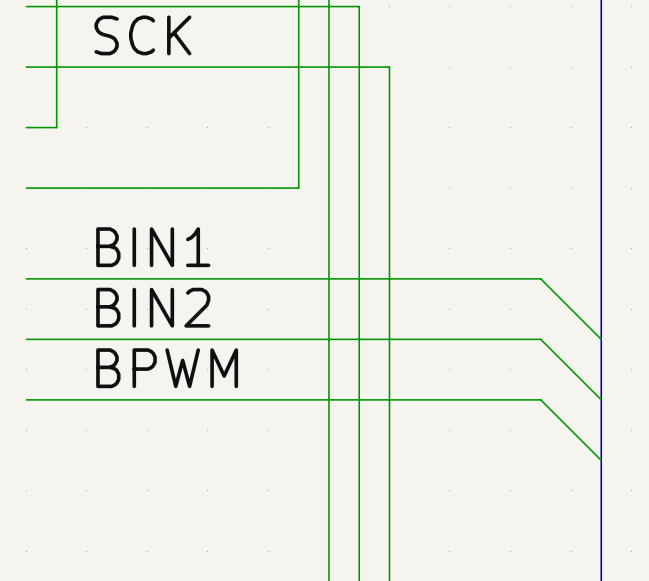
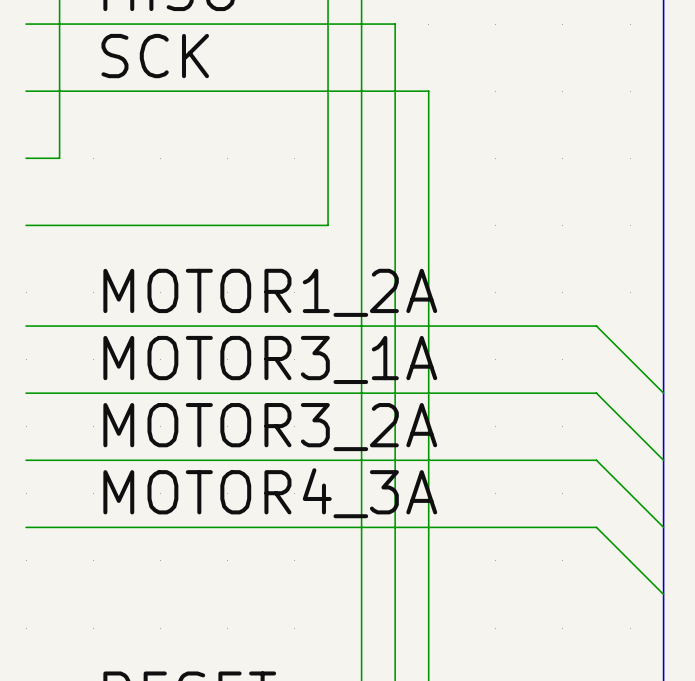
label: BIN1 (153, 247) -> MOTOR1_2A (270, 292)
label: BIN2 (153, 307) -> MOTOR3_1A (270, 359)
label: BPWM (167, 368) -> MOTOR3_2A (270, 427)
label: none -> MOTOR4_3A (270, 493)
wire: none -> (26, 527) (596, 527) (663, 594)

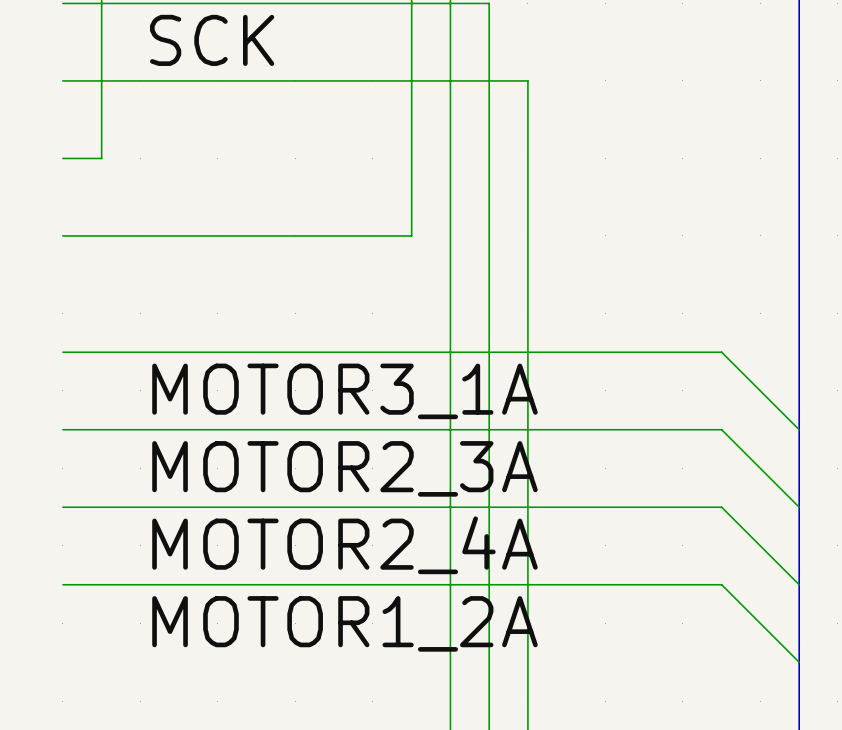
label position: MOTOR1_2A (270, 292) -> MOTOR1_2A (344, 623)
label: MOTOR3_2A (270, 427) -> MOTOR2_3A (344, 468)
label: MOTOR4_3A (270, 493) -> MOTOR2_4A (344, 545)

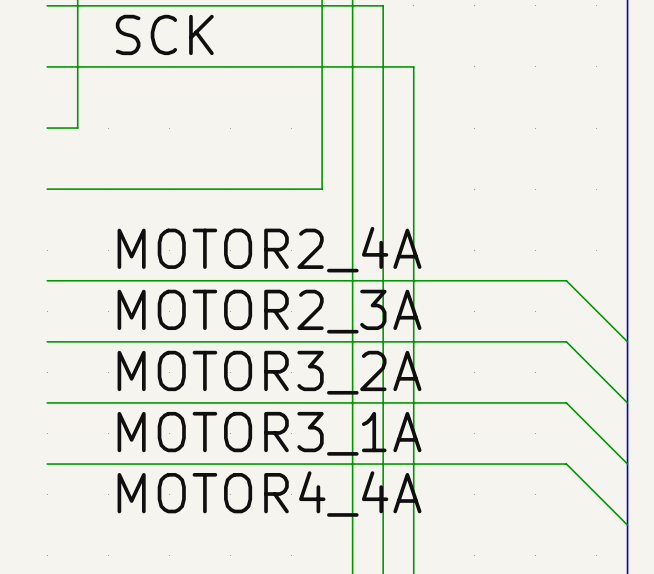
label: none -> MOTOR2_4A (269, 249)
label: MOTOR3_1A (344, 391) -> MOTOR2_3A (269, 311)
label: MOTOR2_3A (344, 468) -> MOTOR3_2A (269, 372)
label: MOTOR2_4A (344, 545) -> MOTOR3_1A (269, 433)
label: MOTOR1_2A (344, 623) -> MOTOR4_4A (269, 494)

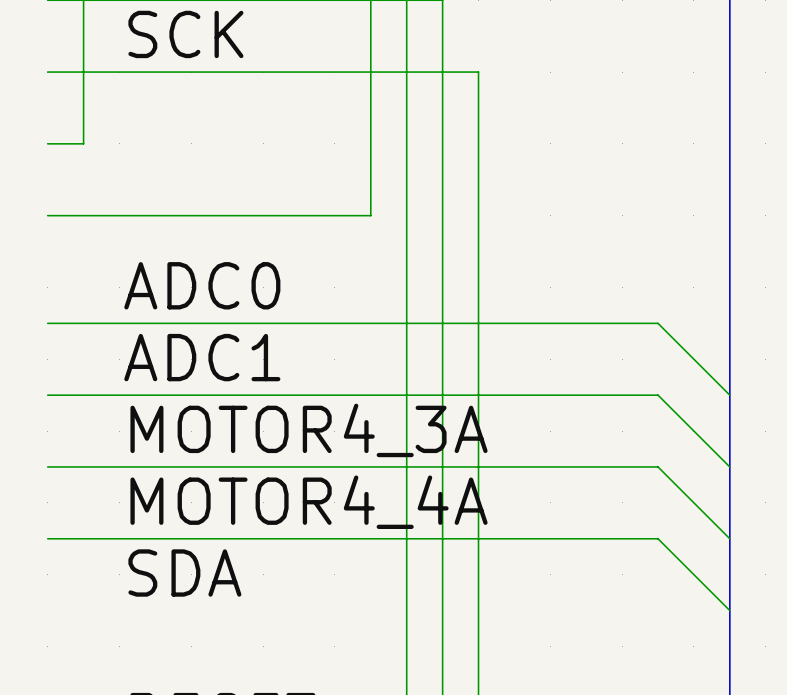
label: MOTOR2_4A (269, 249) -> ADC0 (202, 285)
label: MOTOR2_3A (269, 311) -> ADC1 (202, 357)
label: MOTOR3_2A (269, 372) -> MOTOR4_3A (309, 430)
label: MOTOR3_1A (269, 433) -> MOTOR4_4A (309, 502)
label: MOTOR4_4A (269, 494) -> SDA (184, 573)

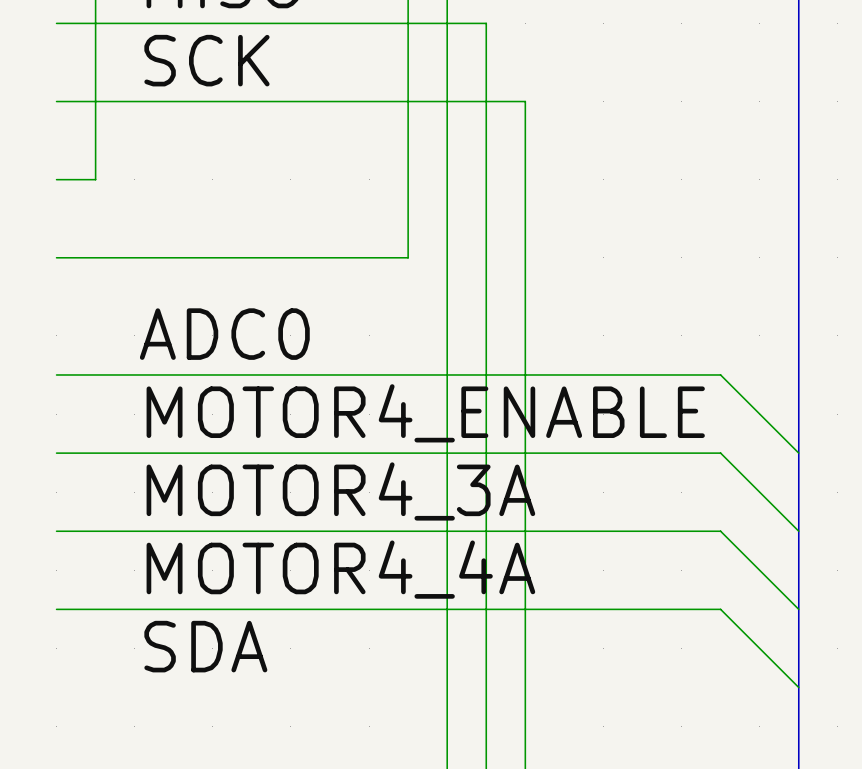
label: ADC1 (202, 357) -> MOTOR4_ENABLE (425, 413)

